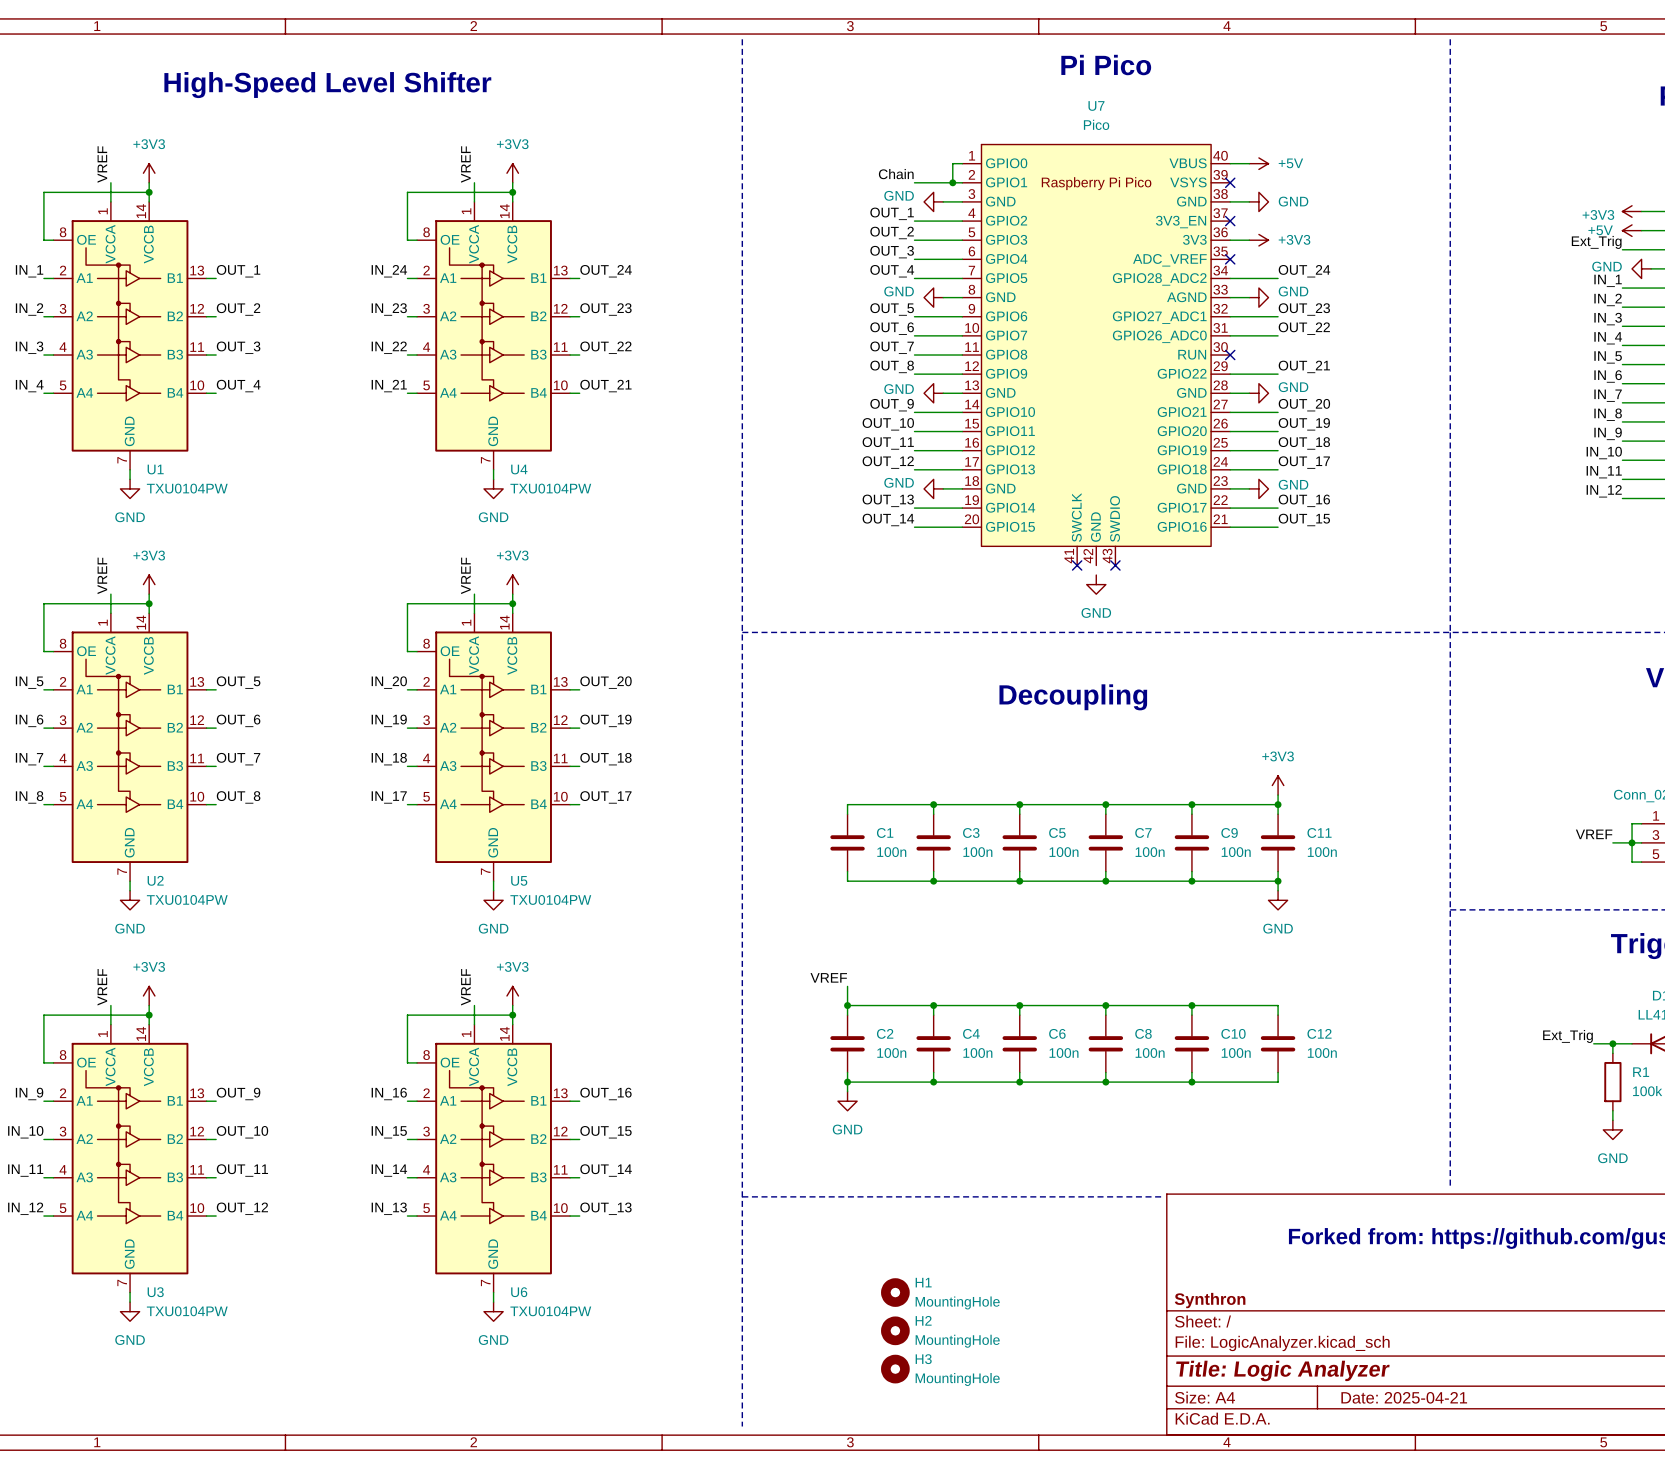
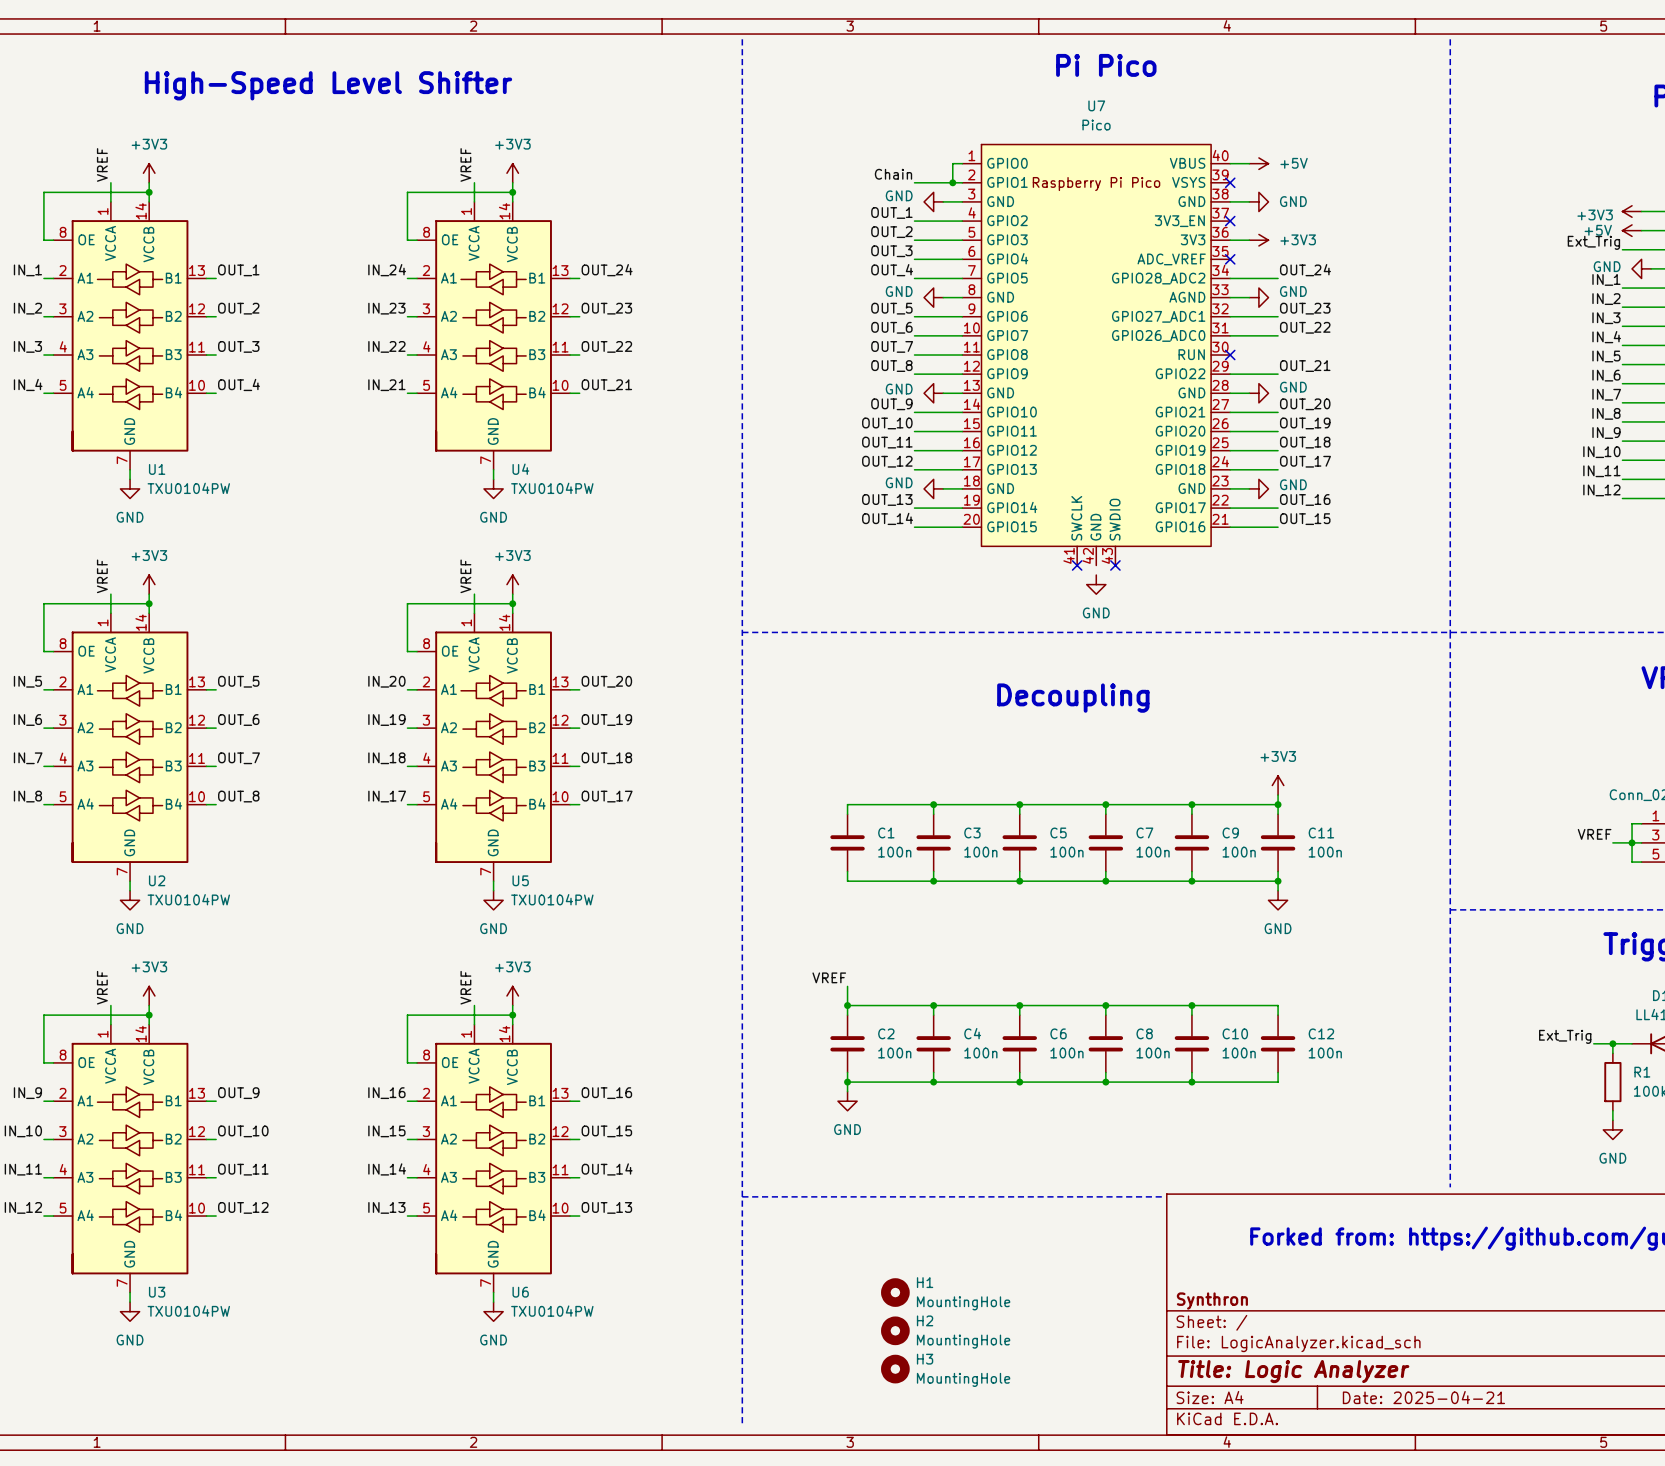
U1 symbol: [53, 201, 207, 470] -> [53, 201, 207, 470]
U4 symbol: [417, 201, 571, 470] -> [417, 201, 571, 470]
U2 symbol: [53, 613, 207, 882] -> [53, 613, 207, 882]
U5 symbol: [417, 613, 571, 882] -> [417, 613, 571, 882]
U3 symbol: [53, 1024, 207, 1293] -> [53, 1024, 207, 1293]
U6 symbol: [417, 1024, 571, 1293] -> [417, 1024, 571, 1293]

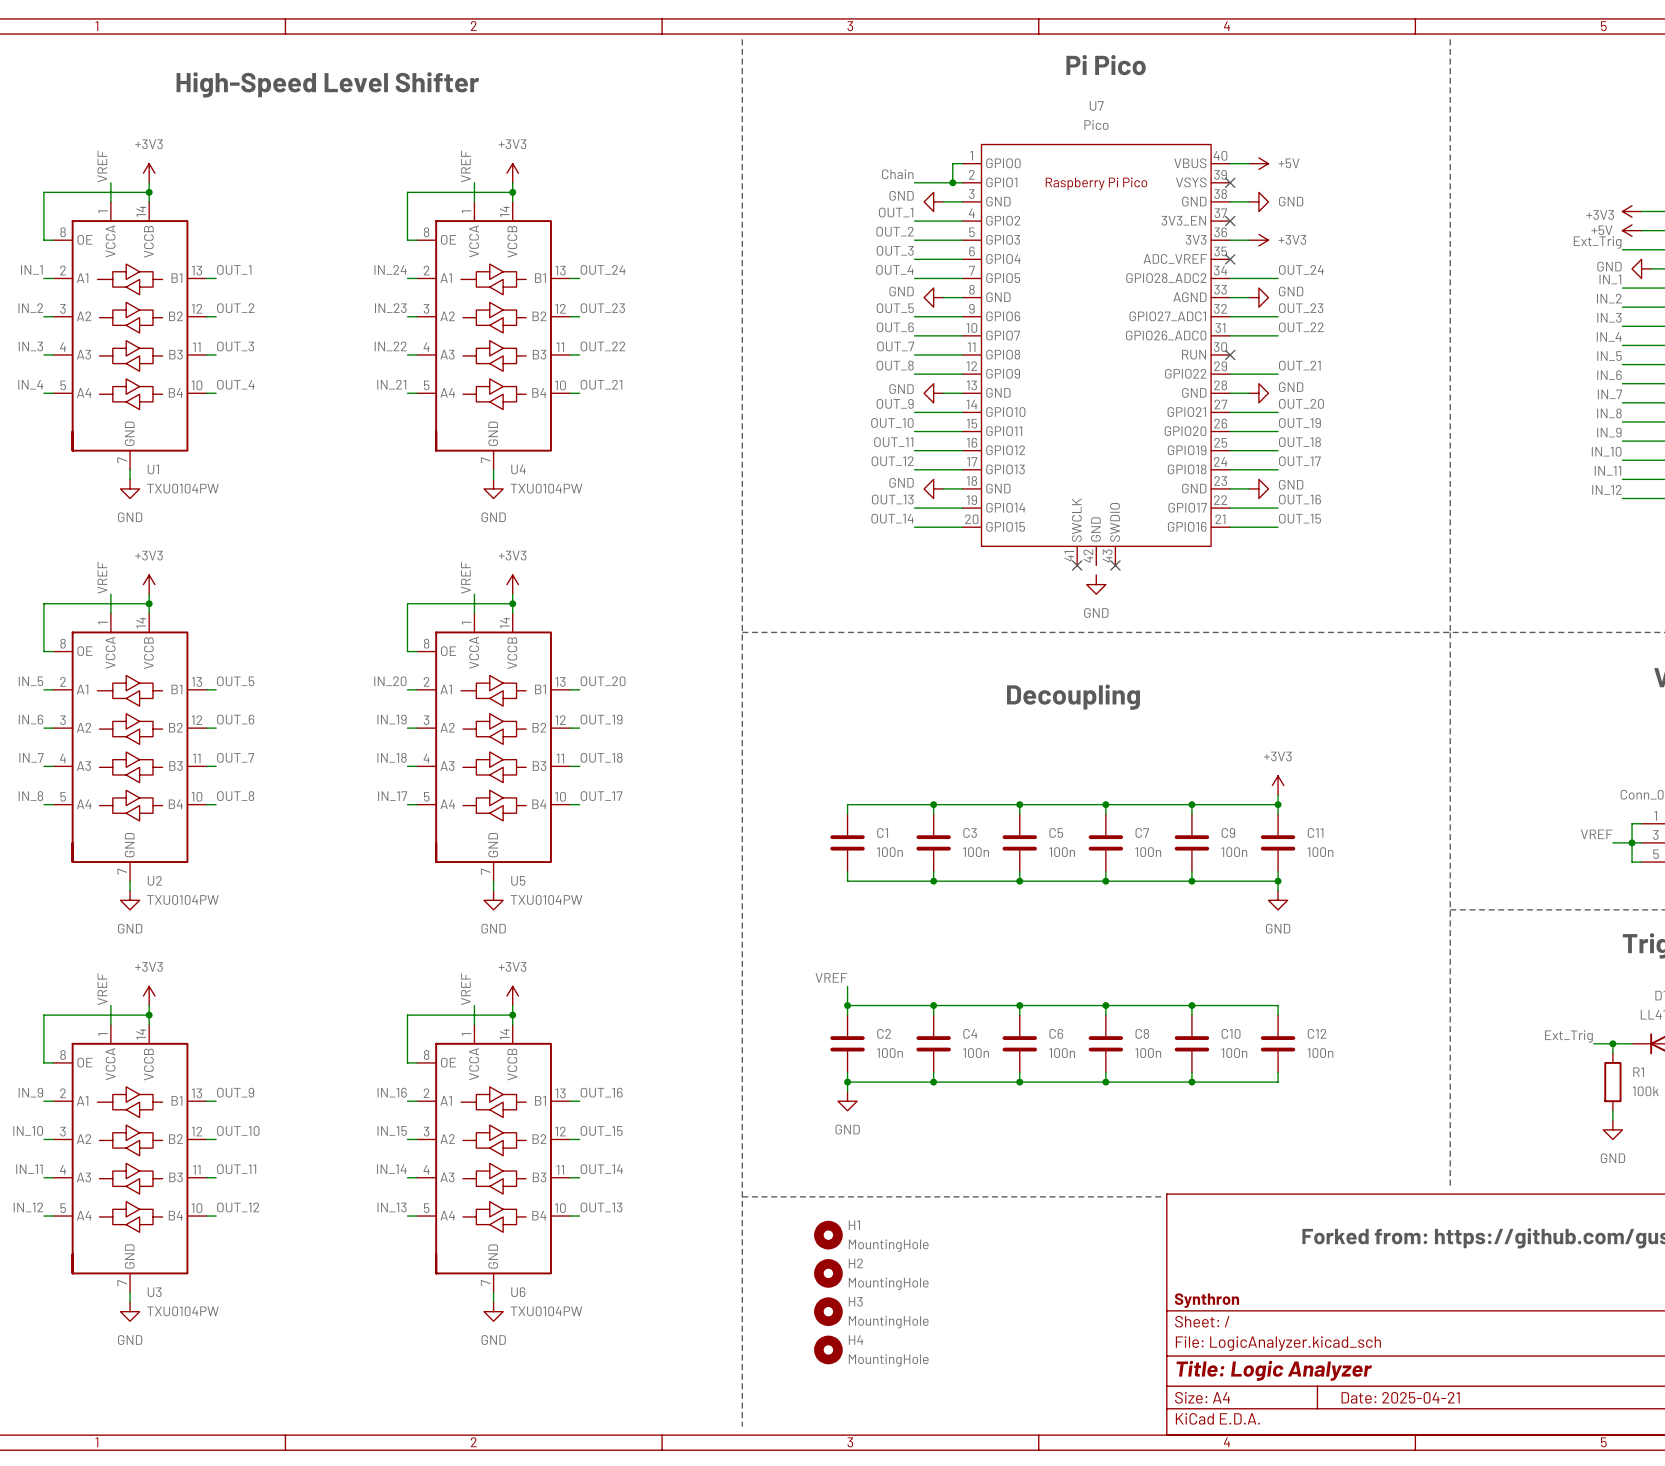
H1 position: (895, 1292) -> (828, 1235)
H2 position: (895, 1330) -> (828, 1273)
H4: none -> MountingHole (828, 1349)
H3 position: (895, 1369) -> (828, 1311)

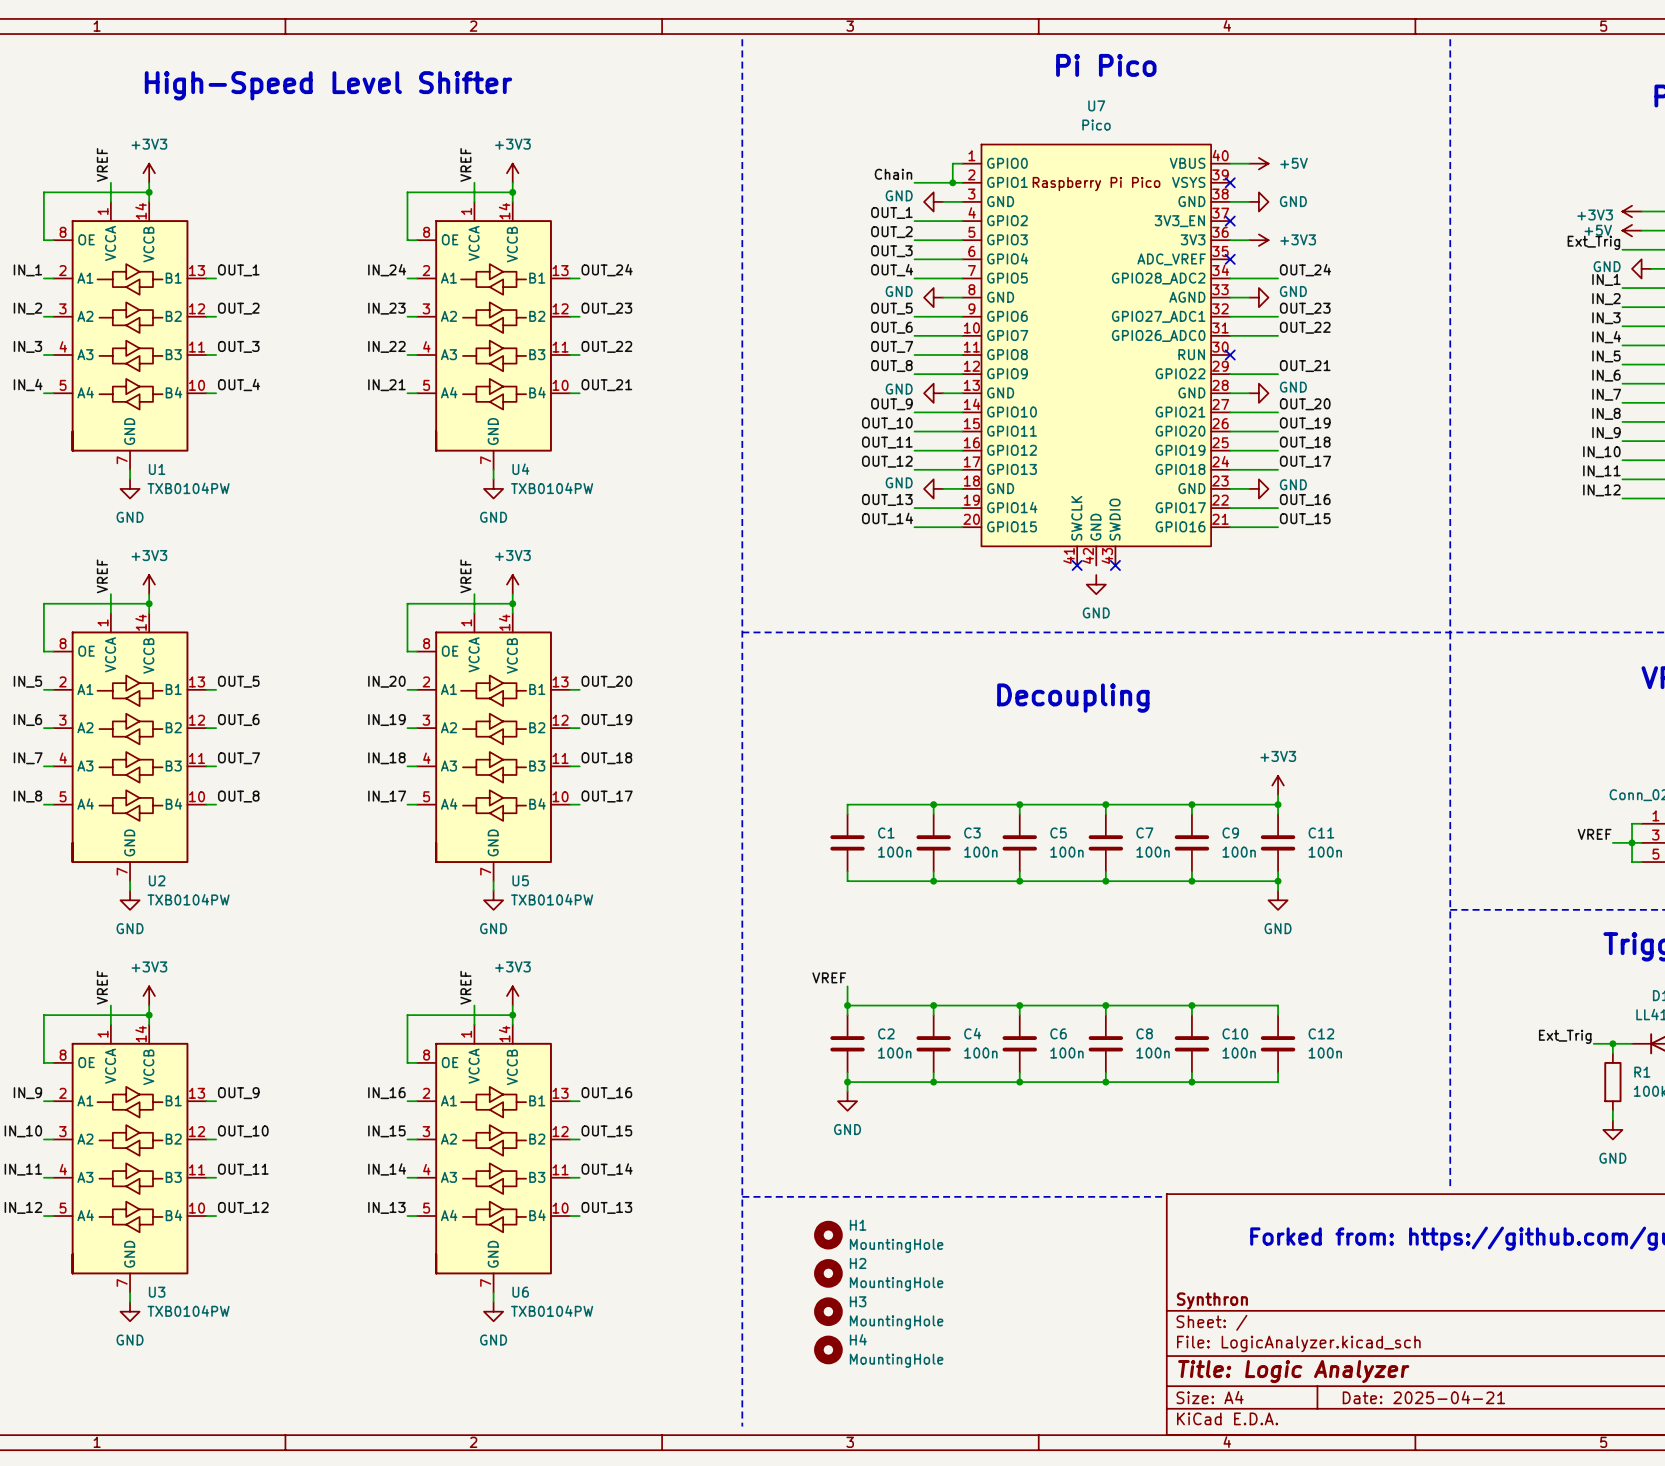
U1 value: TXU0104PW (182, 488) -> TXB0104PW (188, 488)
U4 value: TXU0104PW (546, 488) -> TXB0104PW (552, 488)
U2 value: TXU0104PW (182, 899) -> TXB0104PW (188, 899)
U5 value: TXU0104PW (546, 899) -> TXB0104PW (552, 899)
U3 value: TXU0104PW (182, 1311) -> TXB0104PW (188, 1311)
U6 value: TXU0104PW (546, 1311) -> TXB0104PW (552, 1311)

